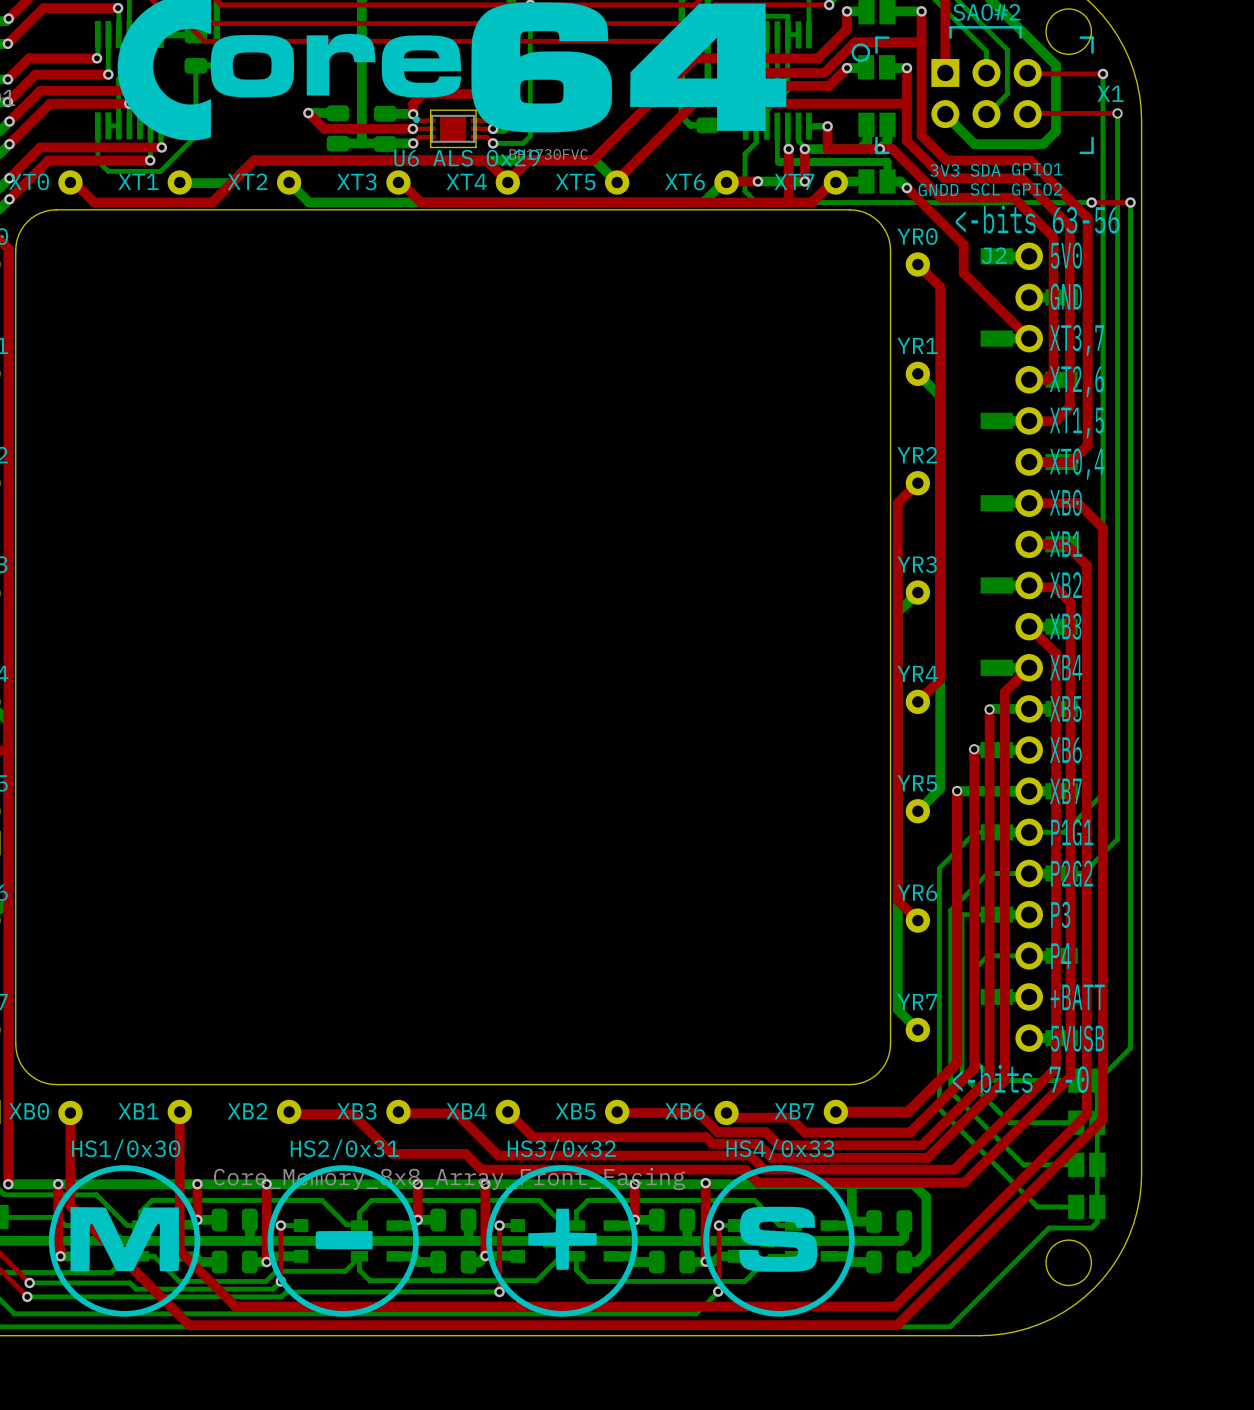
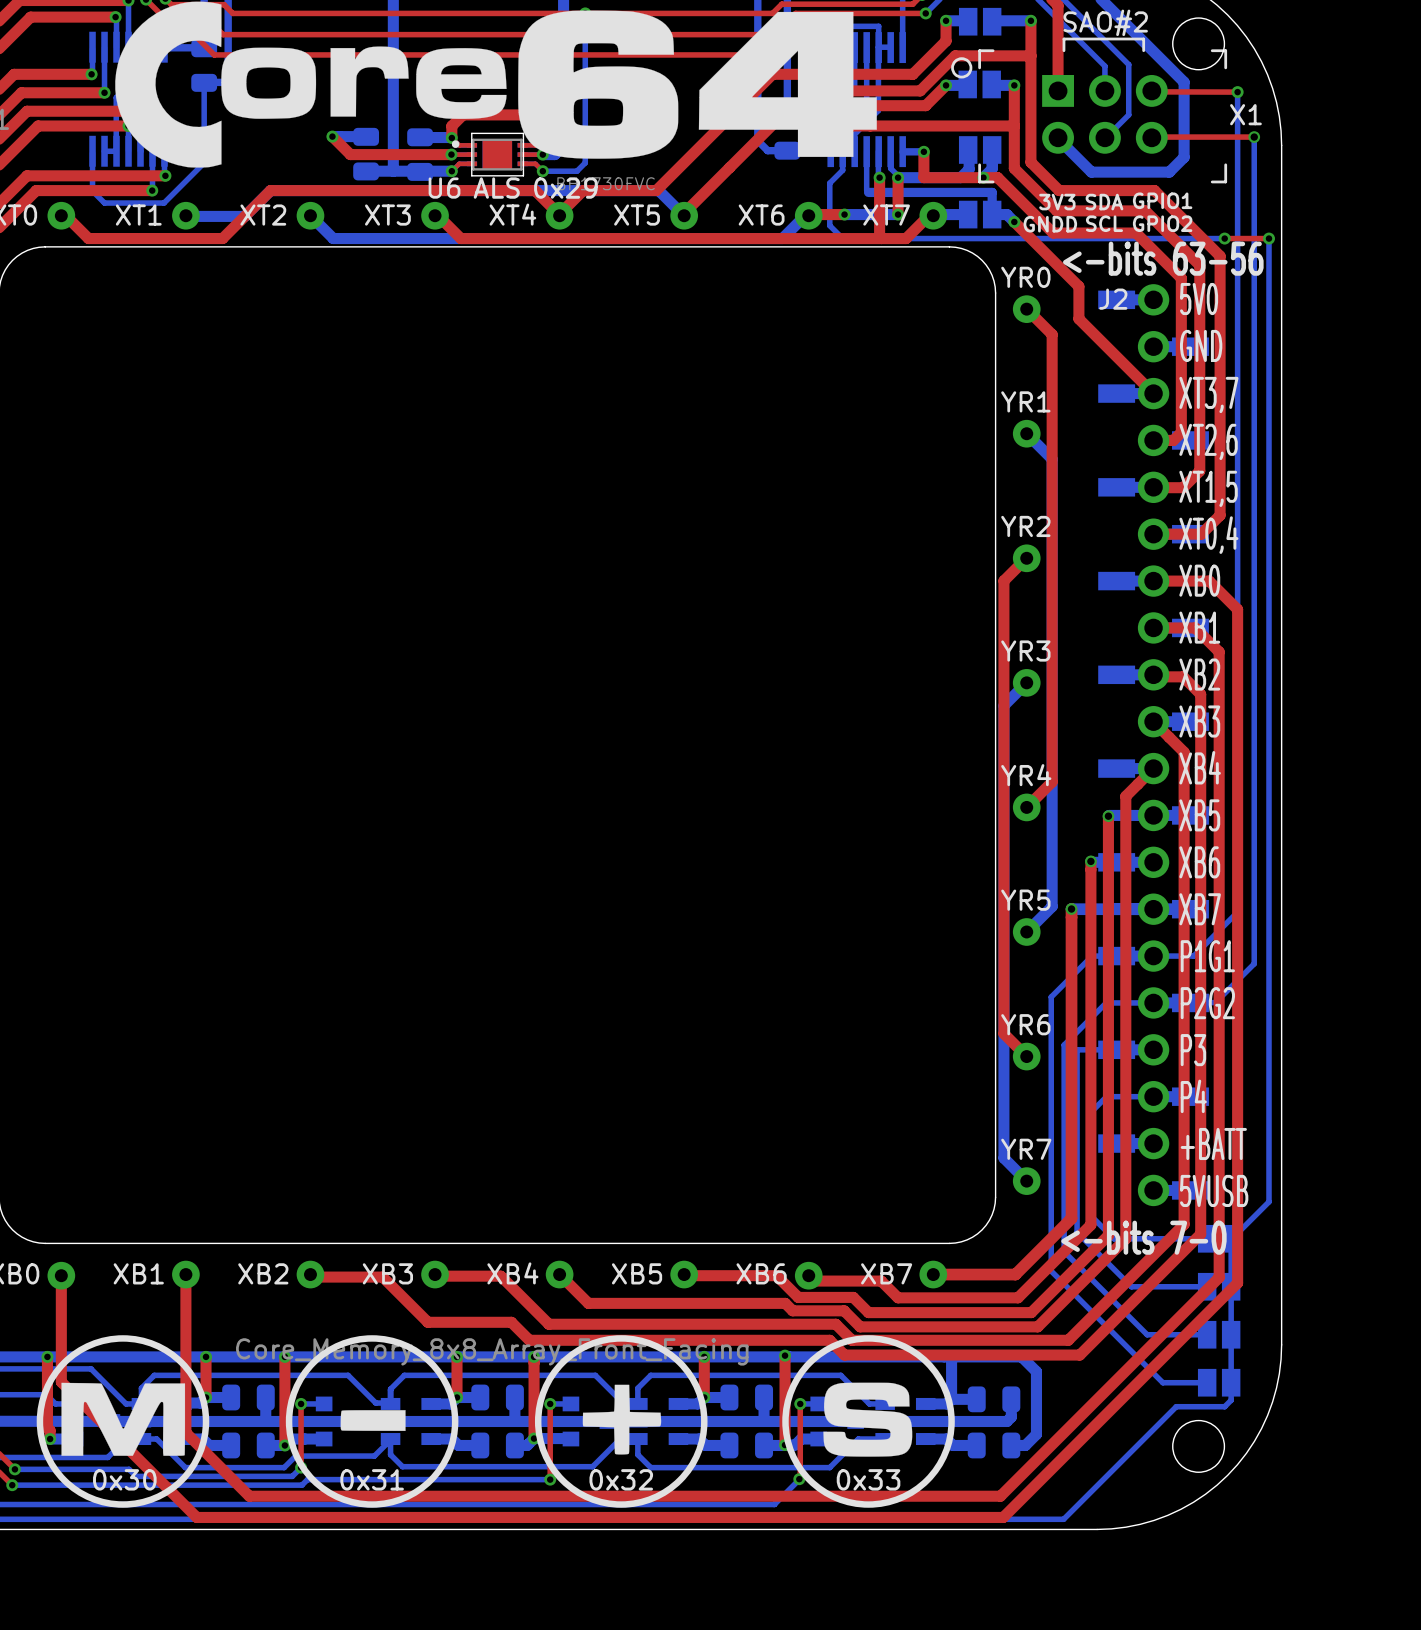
text: HS1/0x30 (126, 1149) -> none
text: HS2/0x31 (344, 1149) -> none
text: HS3/0x32 (561, 1149) -> none
text: HS4/0x33 (780, 1149) -> none
text: none -> 0x30 (124, 1479)
text: none -> 0x31 (372, 1479)
text: none -> 0x32 (621, 1479)
text: none -> 0x33 (868, 1479)

